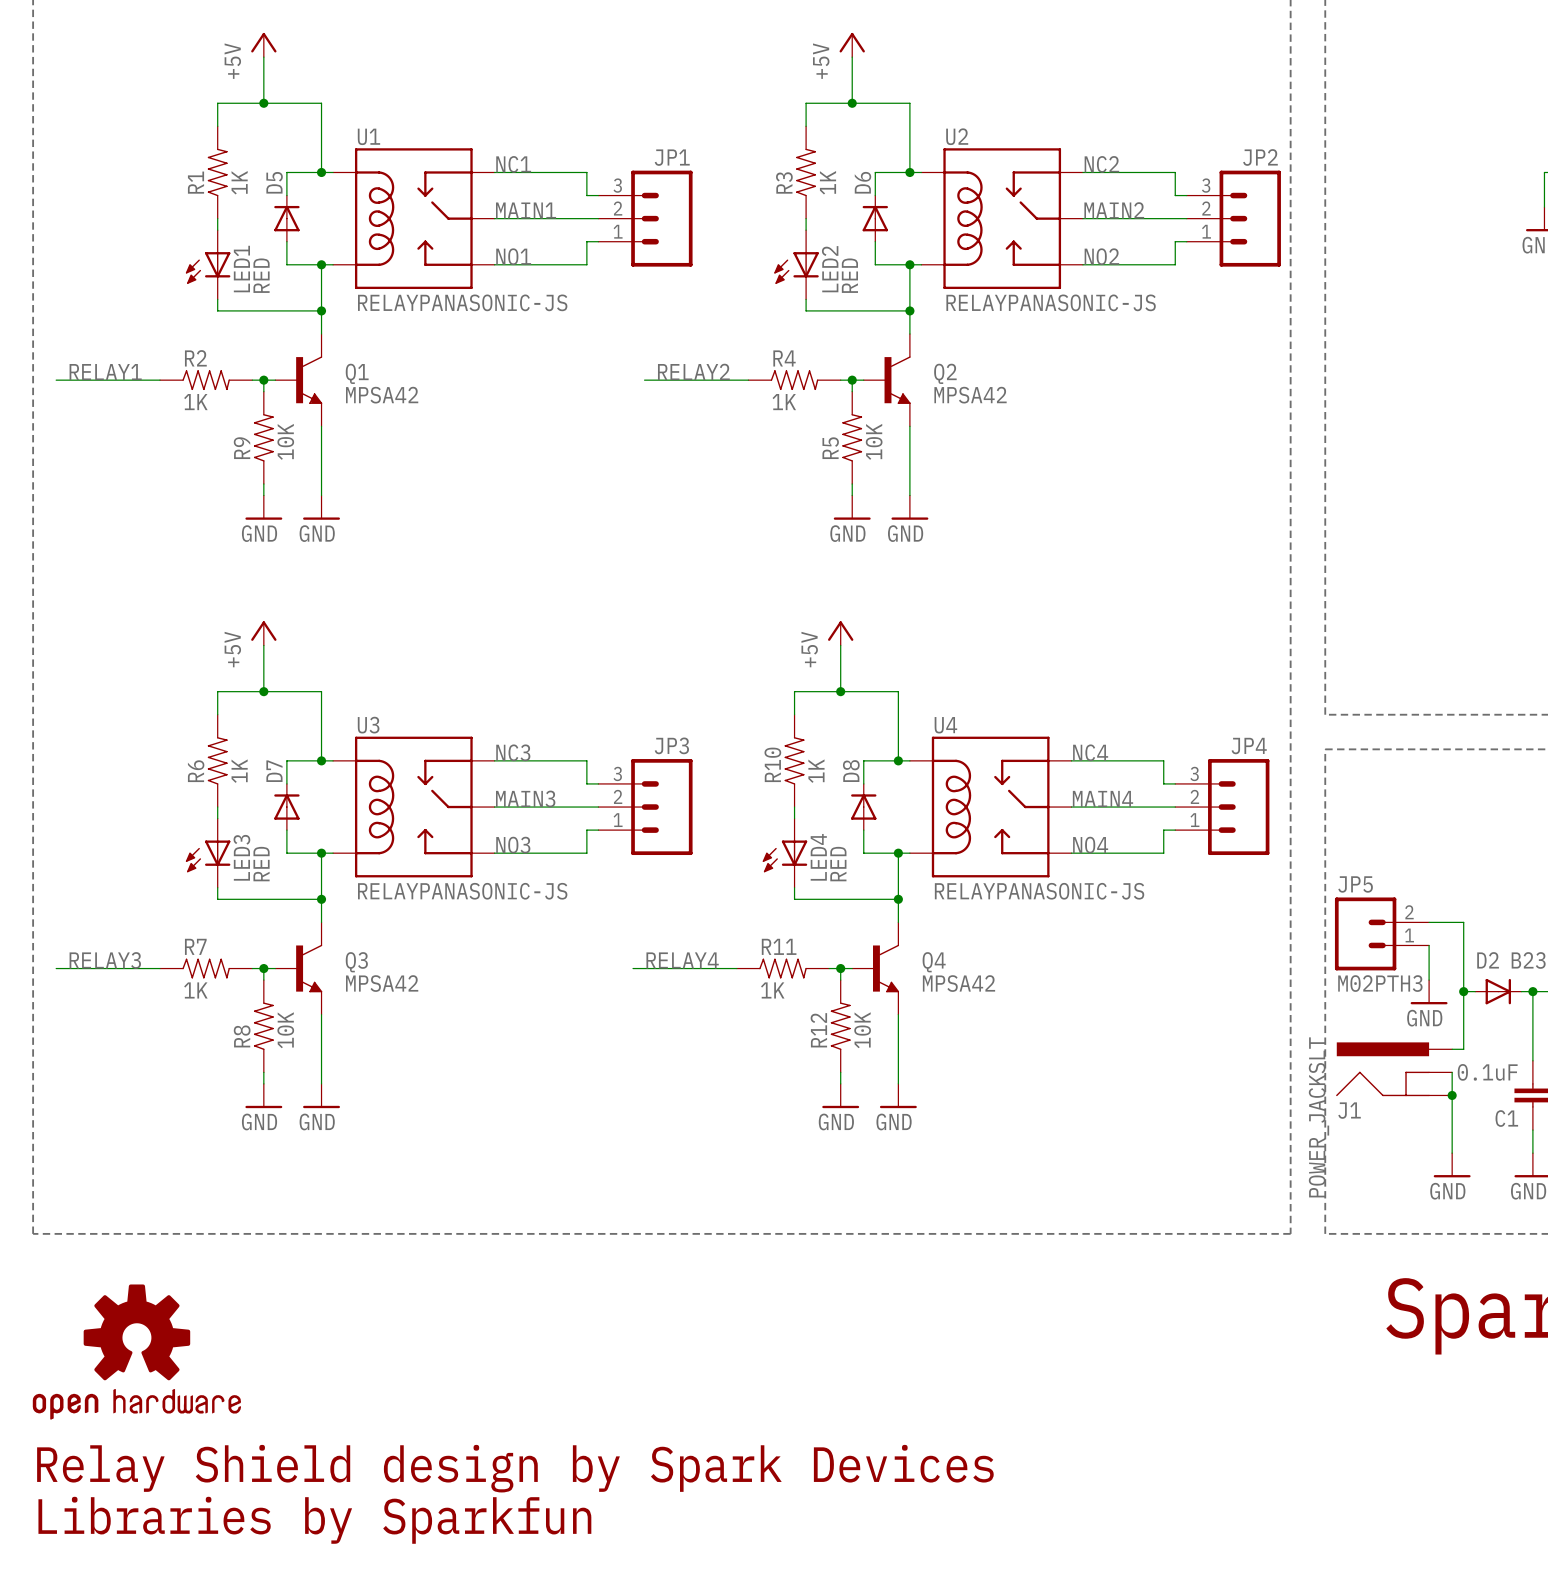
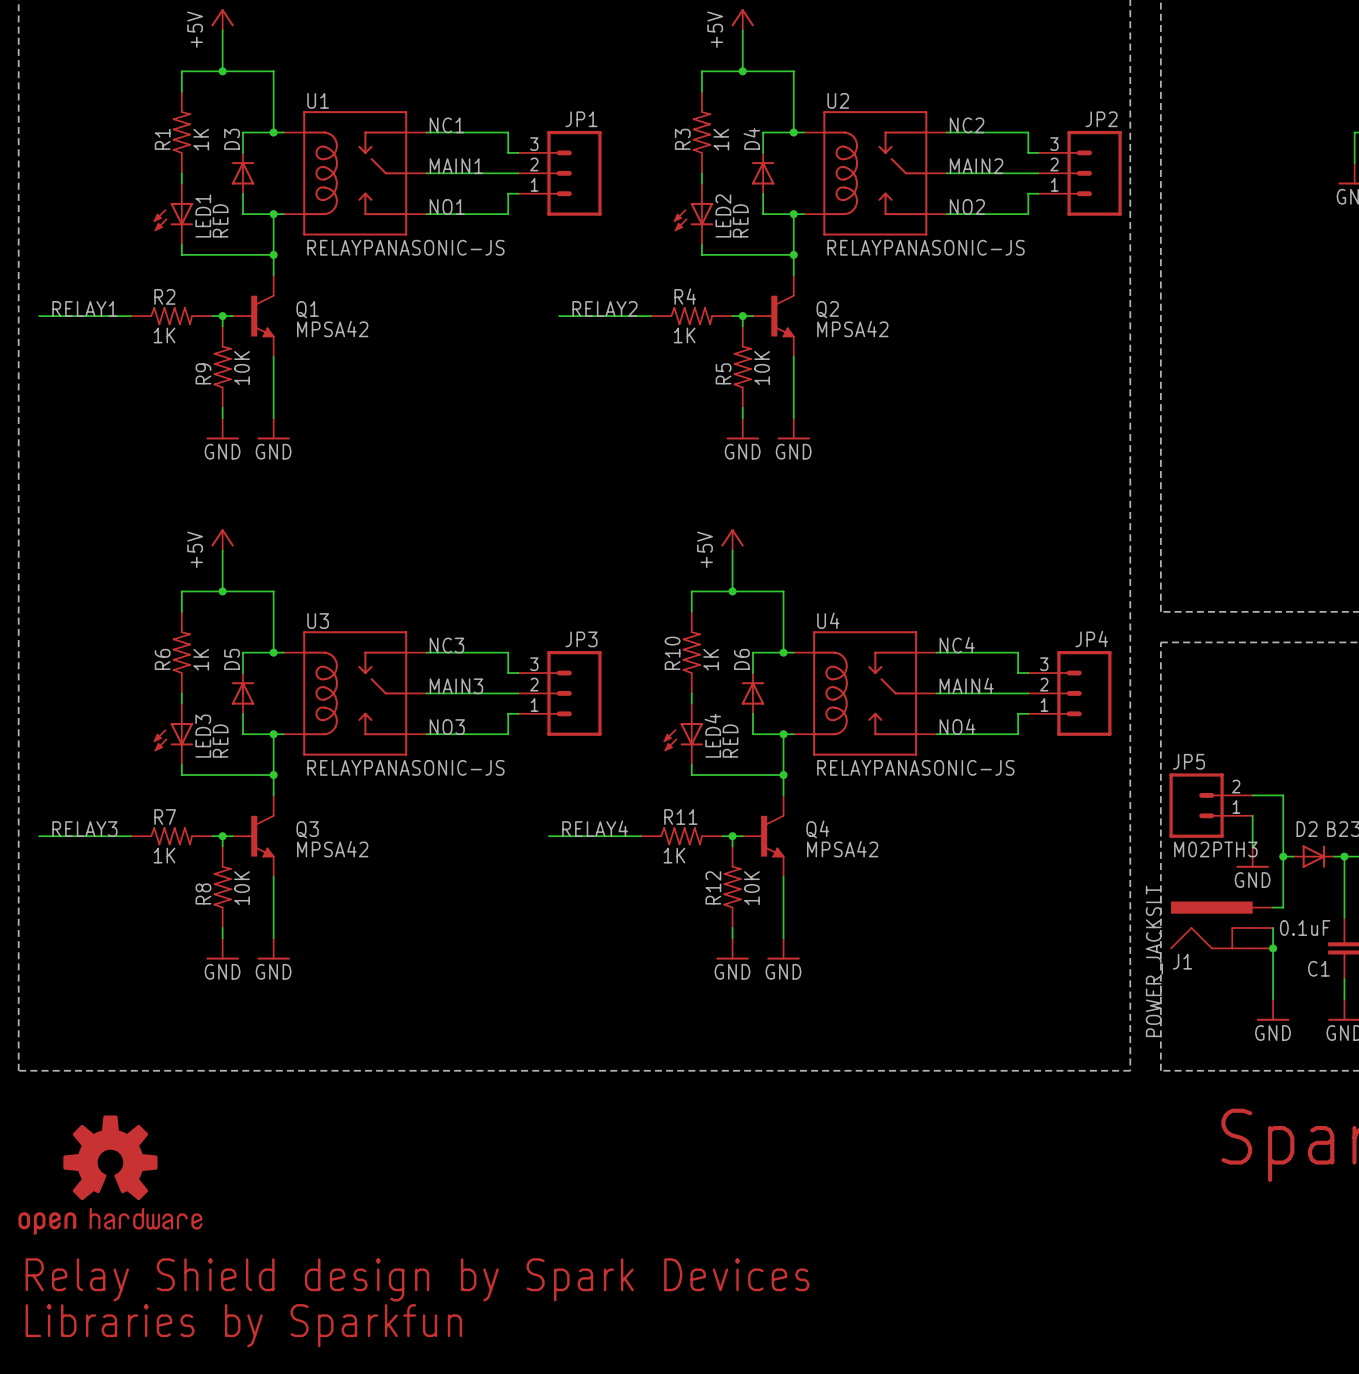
D5 name: D5 (274, 182) -> D3 (232, 139)
D6 name: D6 (862, 182) -> D4 (751, 139)
D7 name: D7 (274, 771) -> D5 (232, 659)
D8 name: D8 (851, 771) -> D6 (741, 659)

